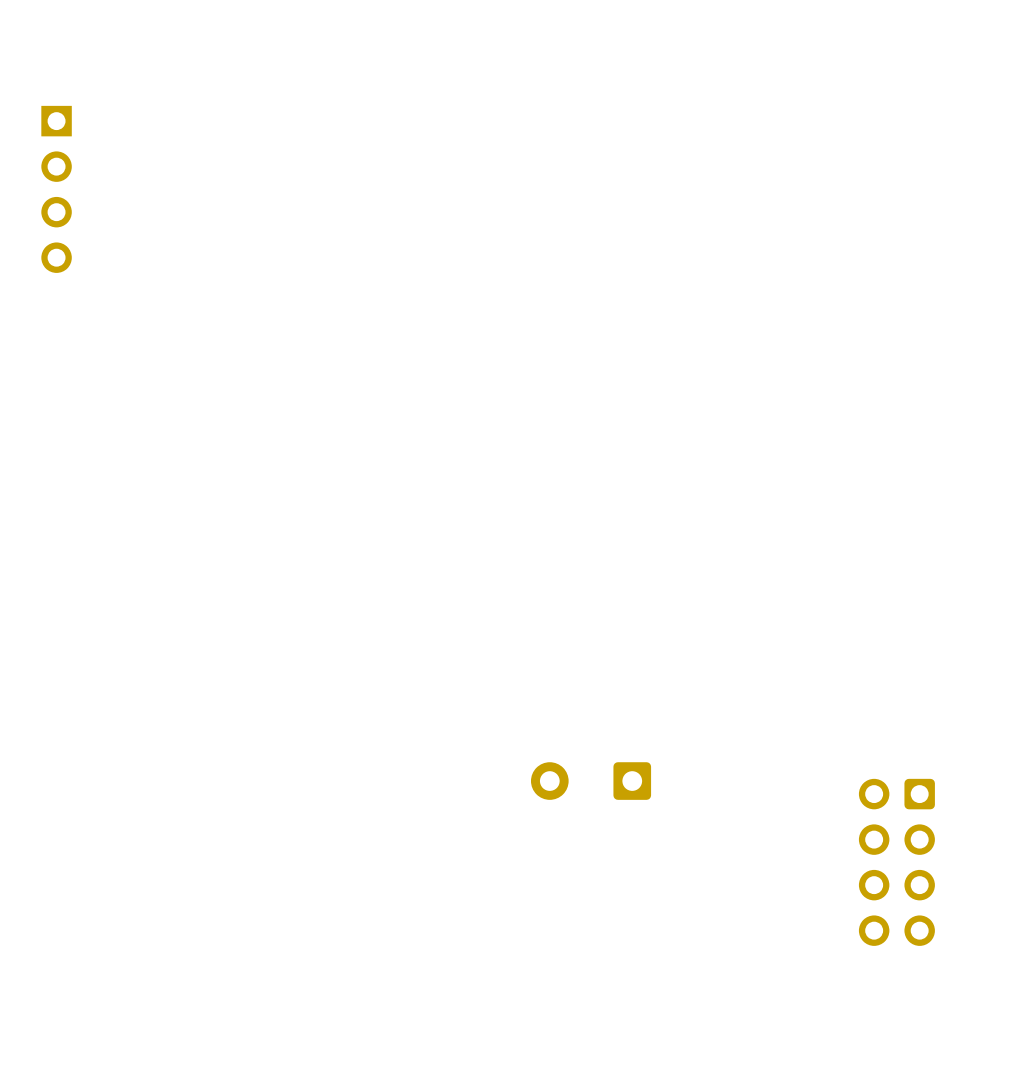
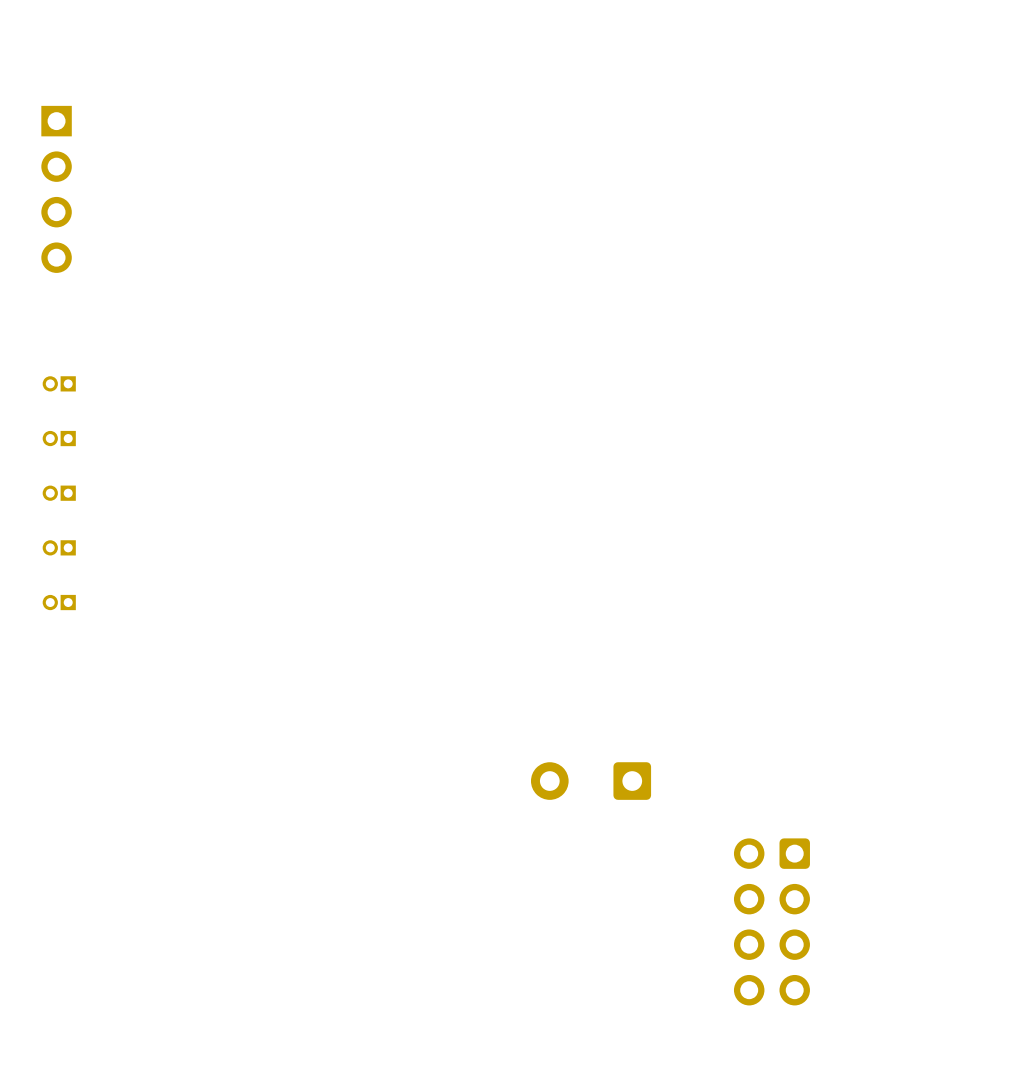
part: none -> (59, 383)
part: none -> (59, 438)
part: none -> (59, 493)
part: none -> (59, 547)
part: none -> (59, 602)
part position: (896, 862) -> (771, 921)

